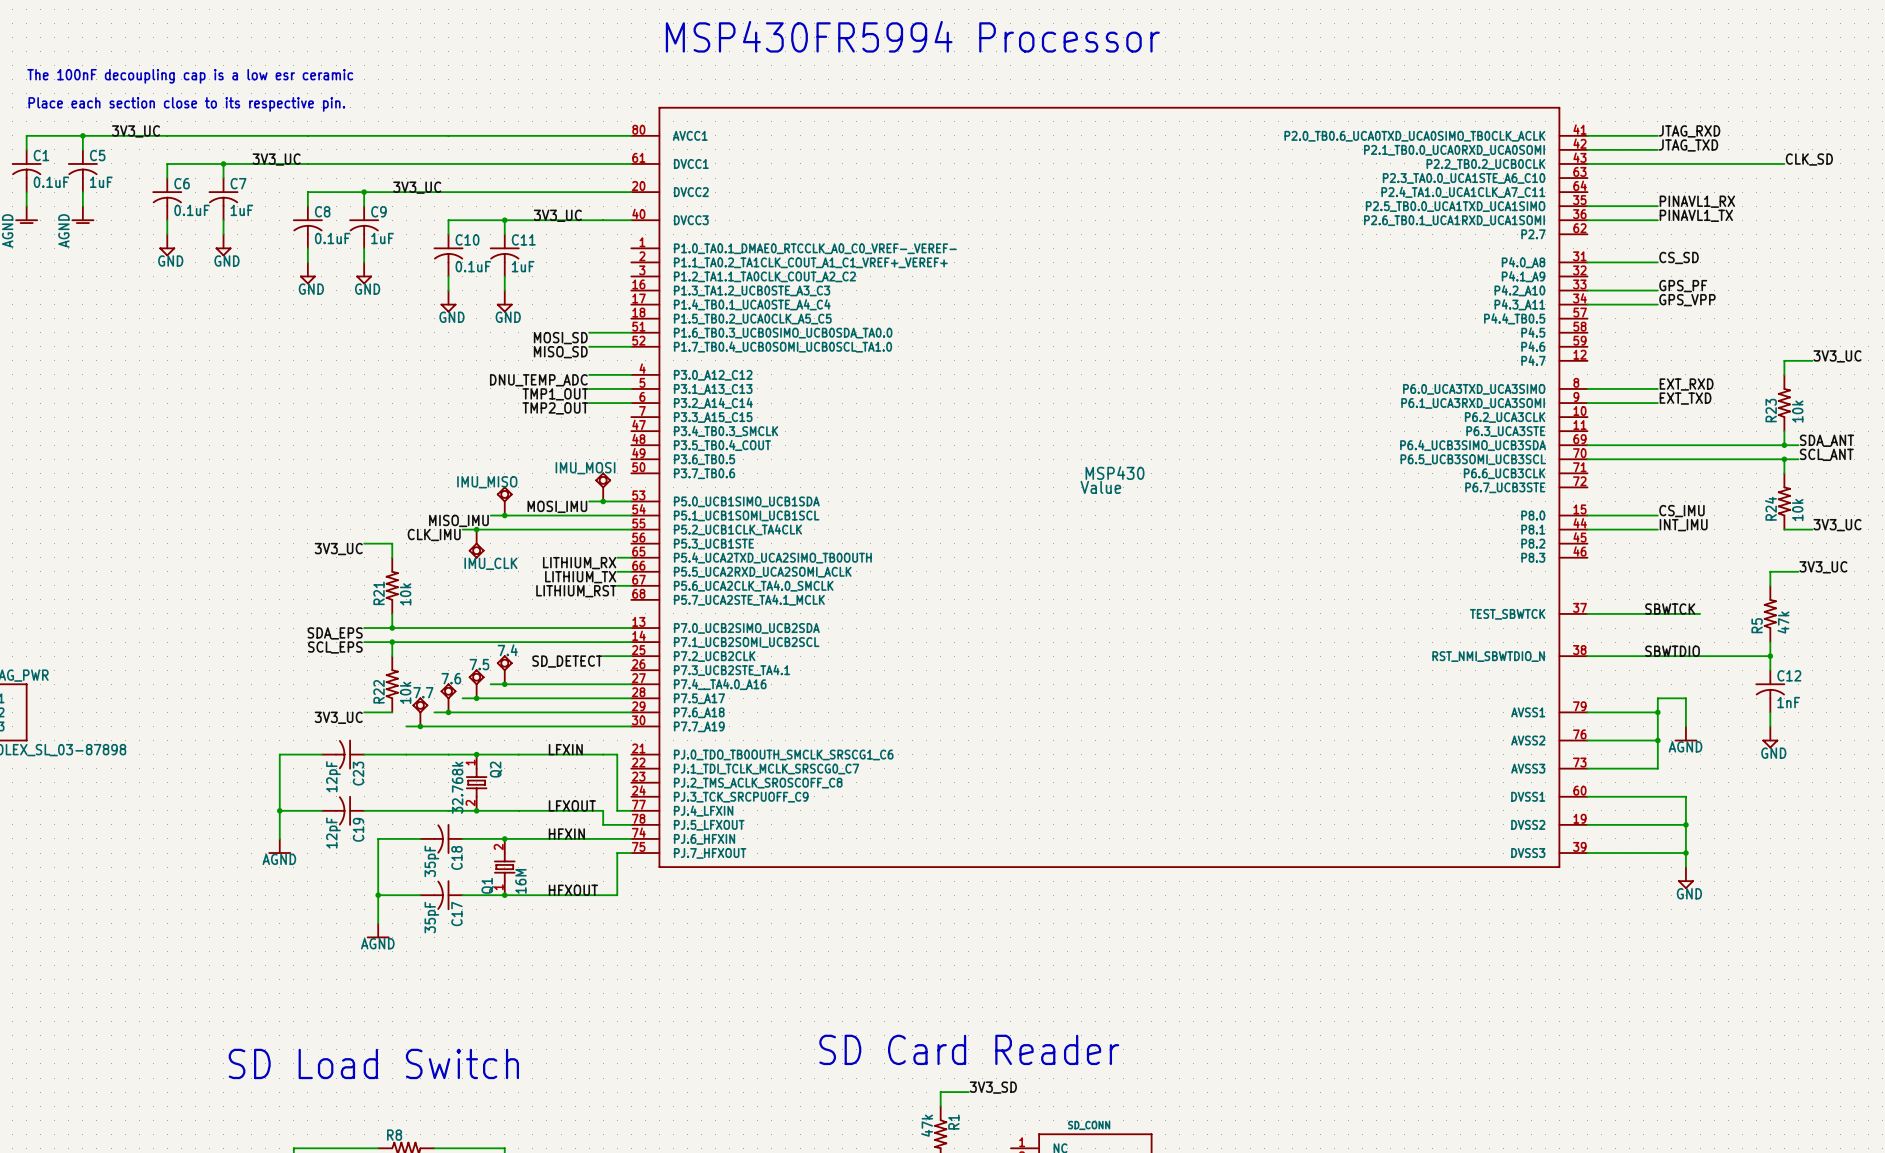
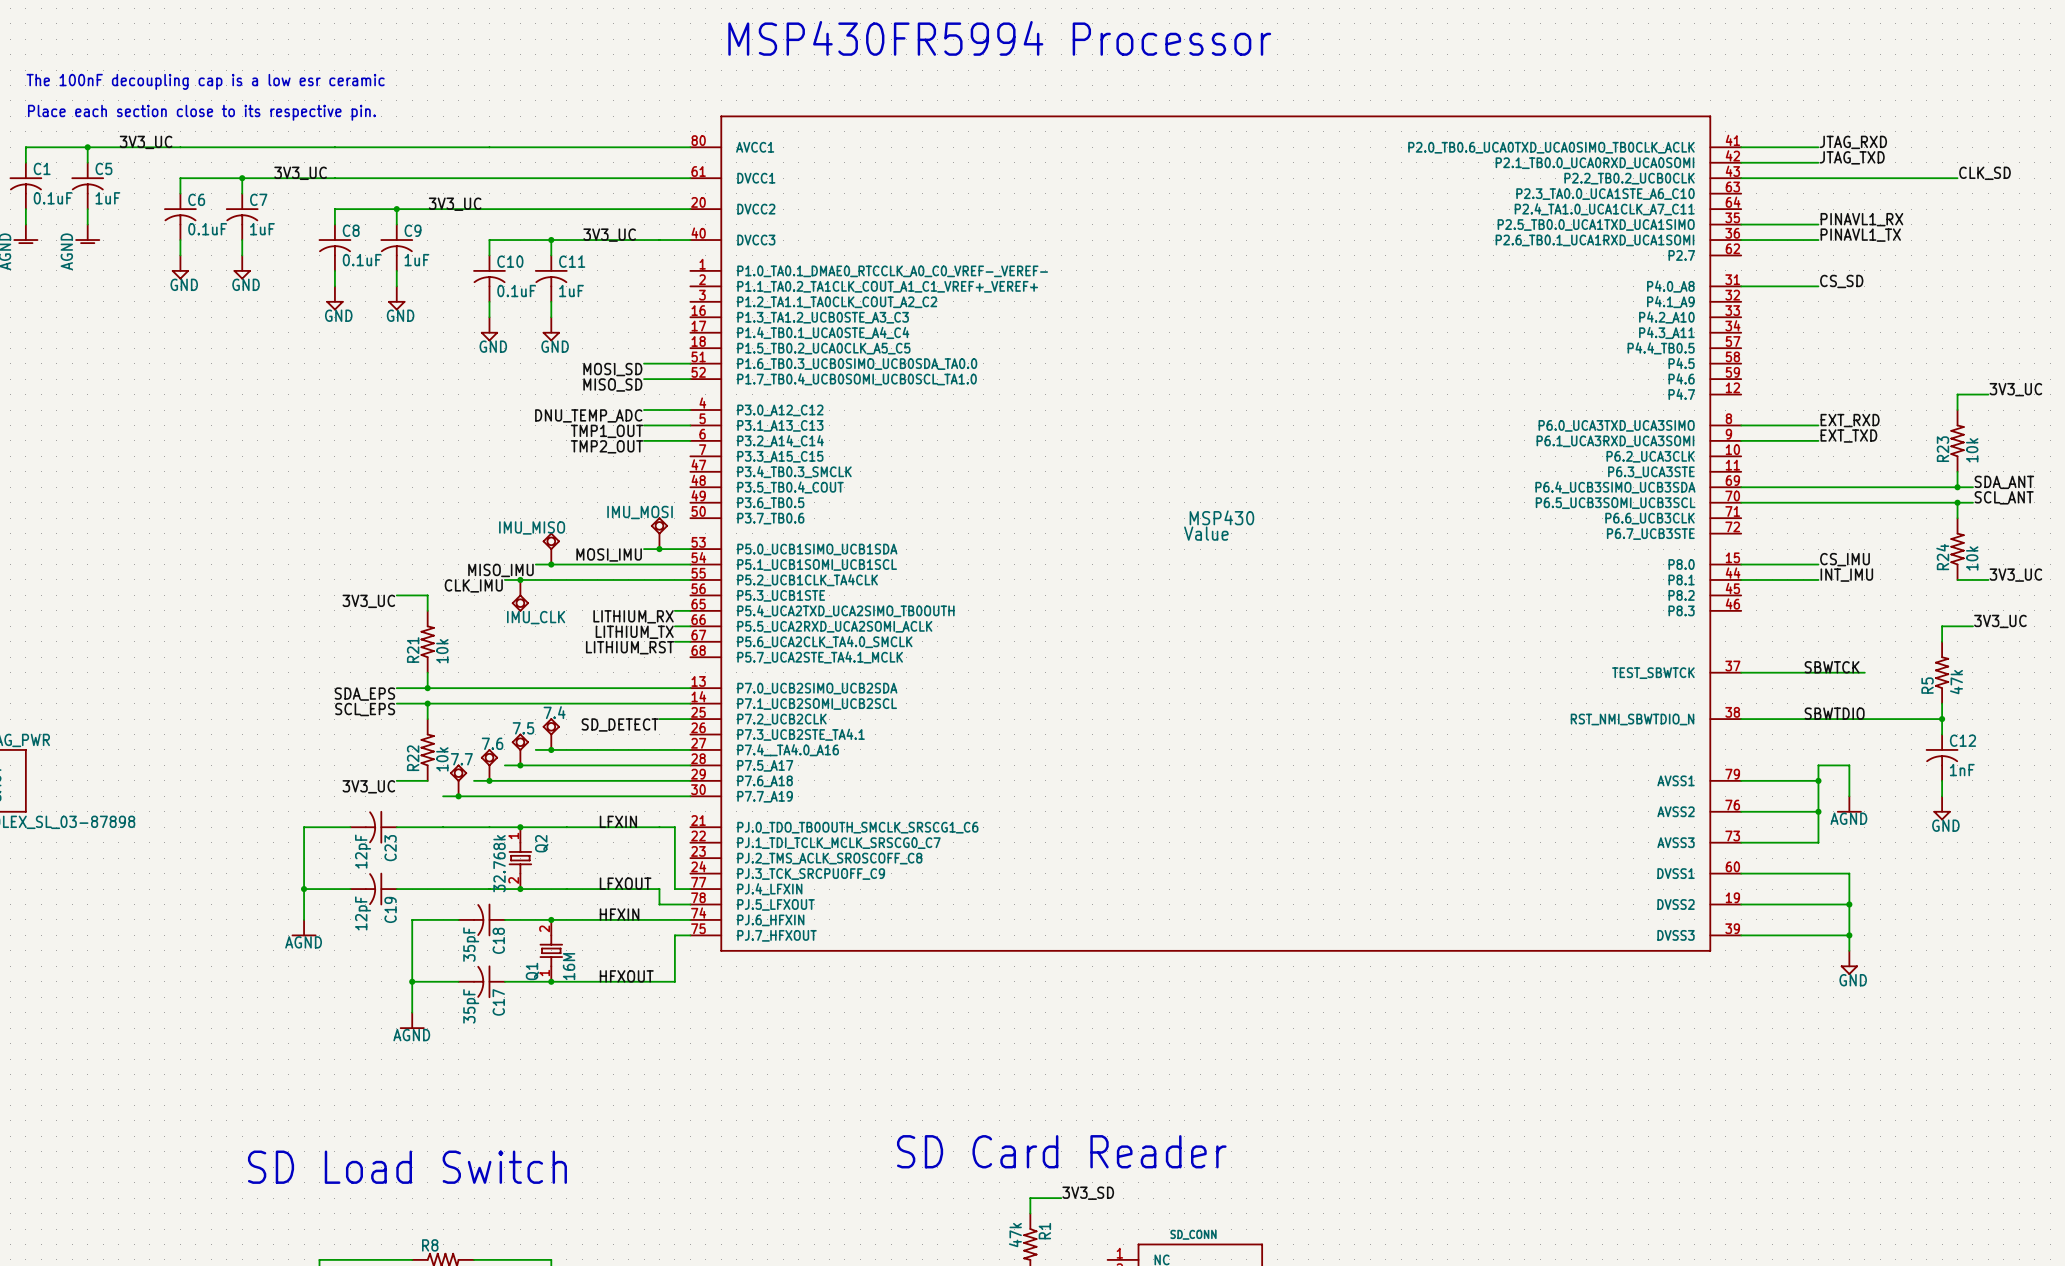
label: GPS_PF (1683, 286) -> none
wire: (1587, 290) (1657, 290) -> none
label: GPS_VPP (1687, 300) -> none
wire: (1587, 304) (1657, 304) -> none

